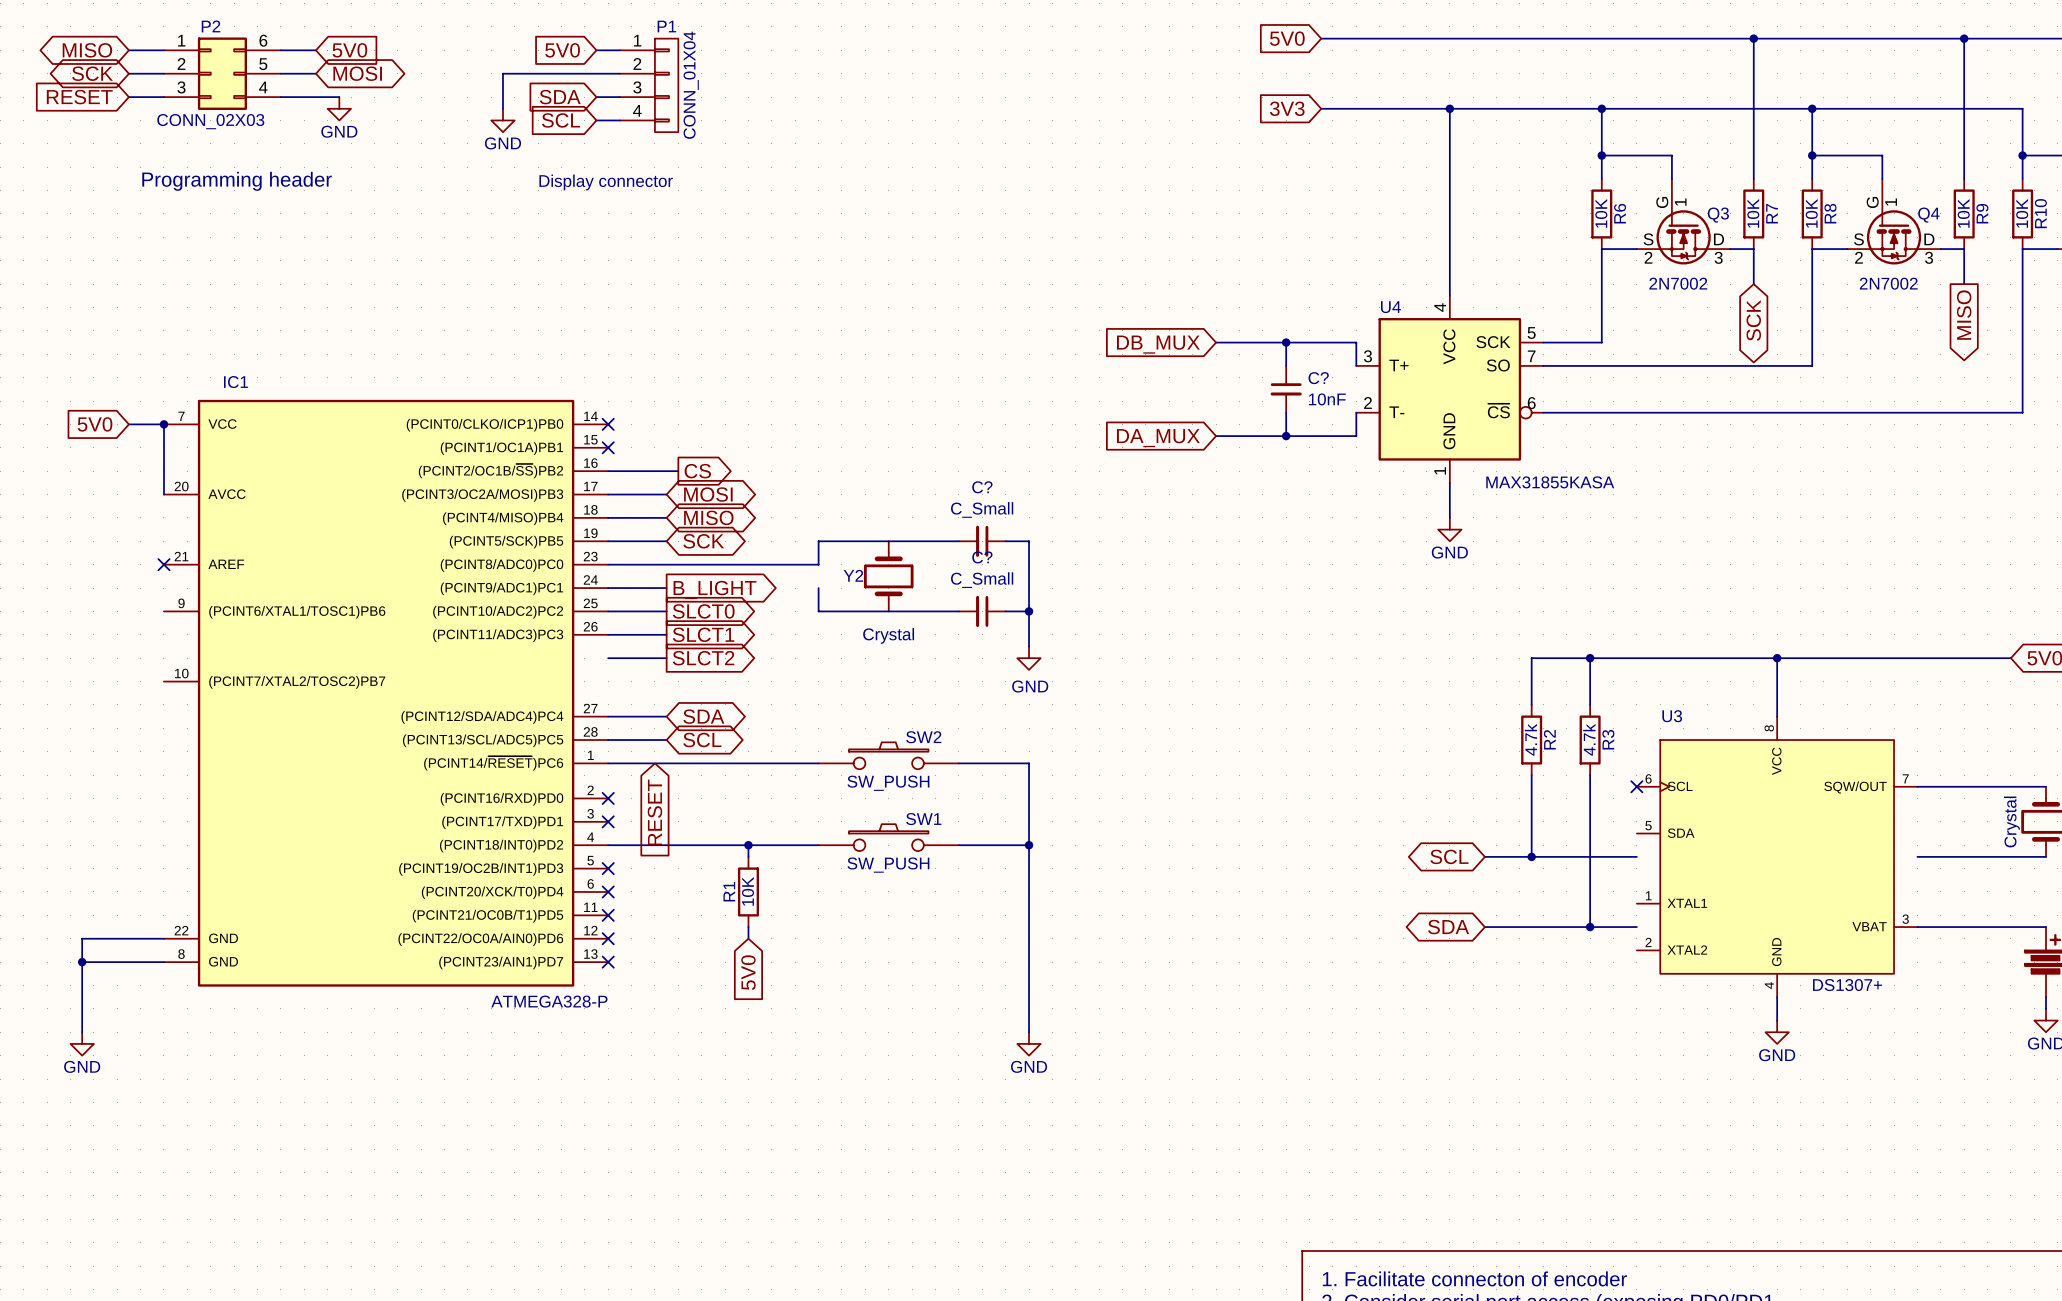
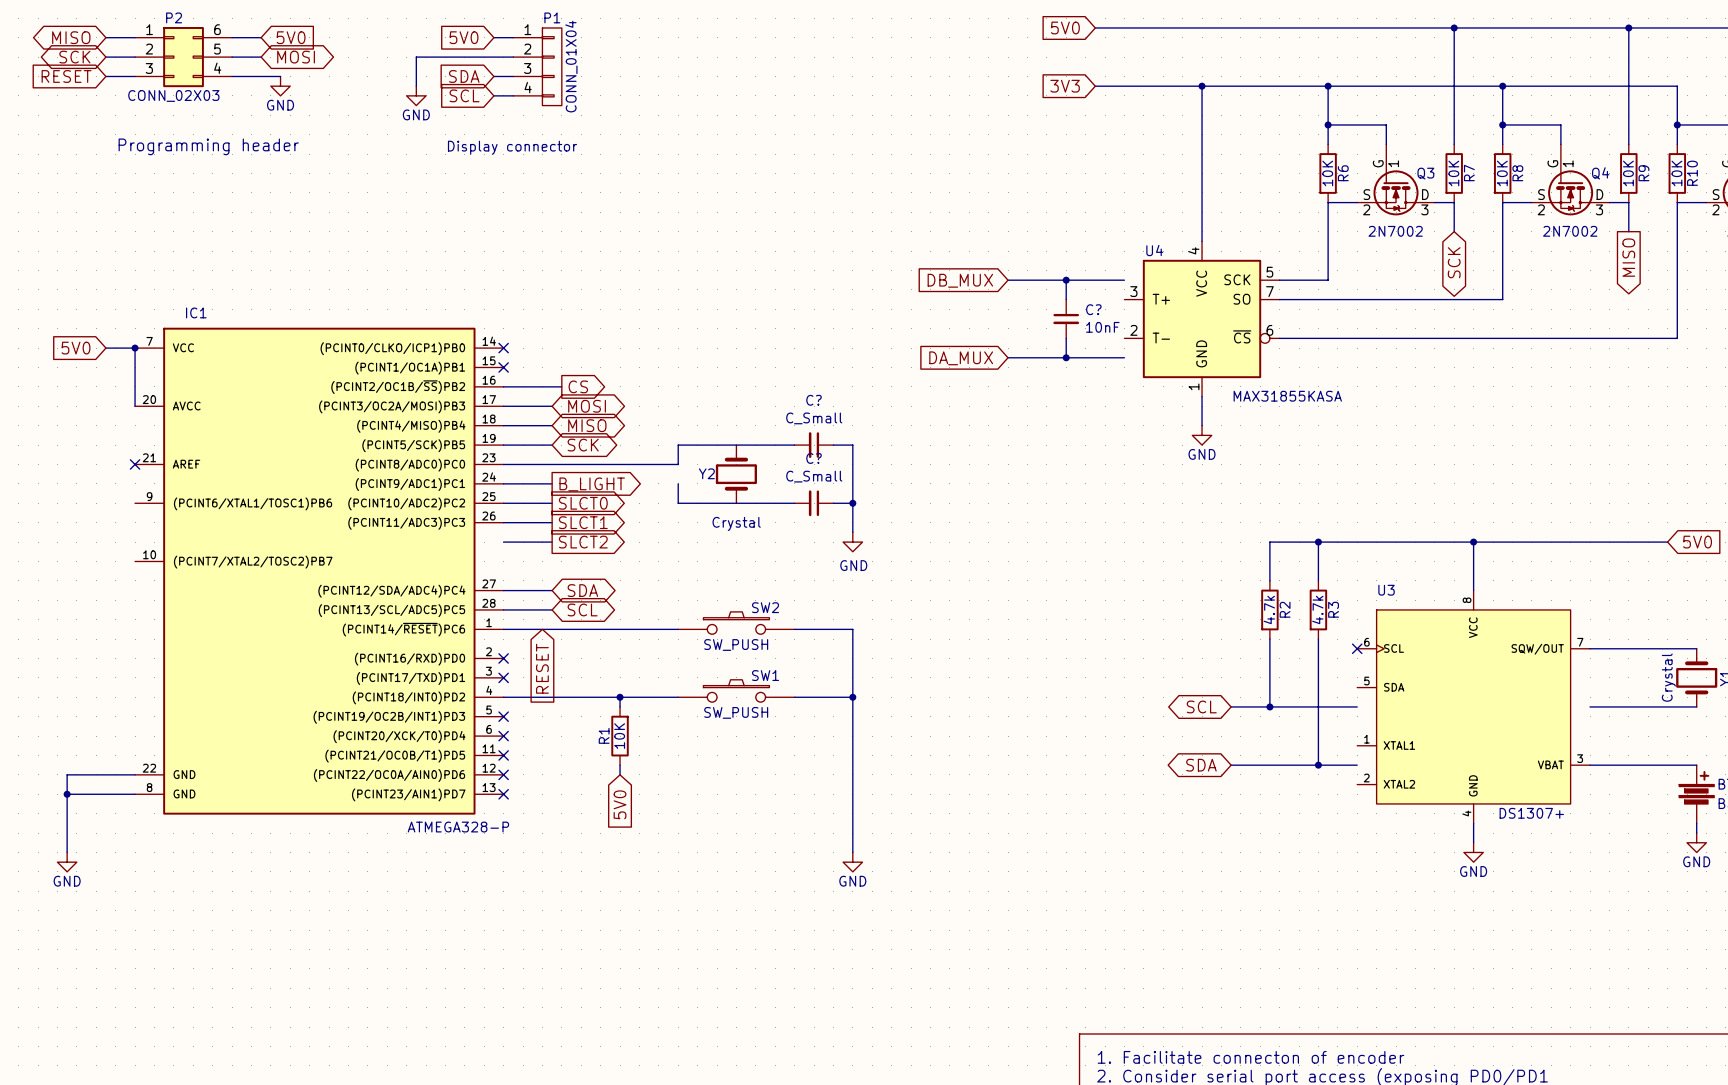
wire: (1356, 342) (1356, 365) -> none
wire: (1356, 412) (1356, 436) -> none

